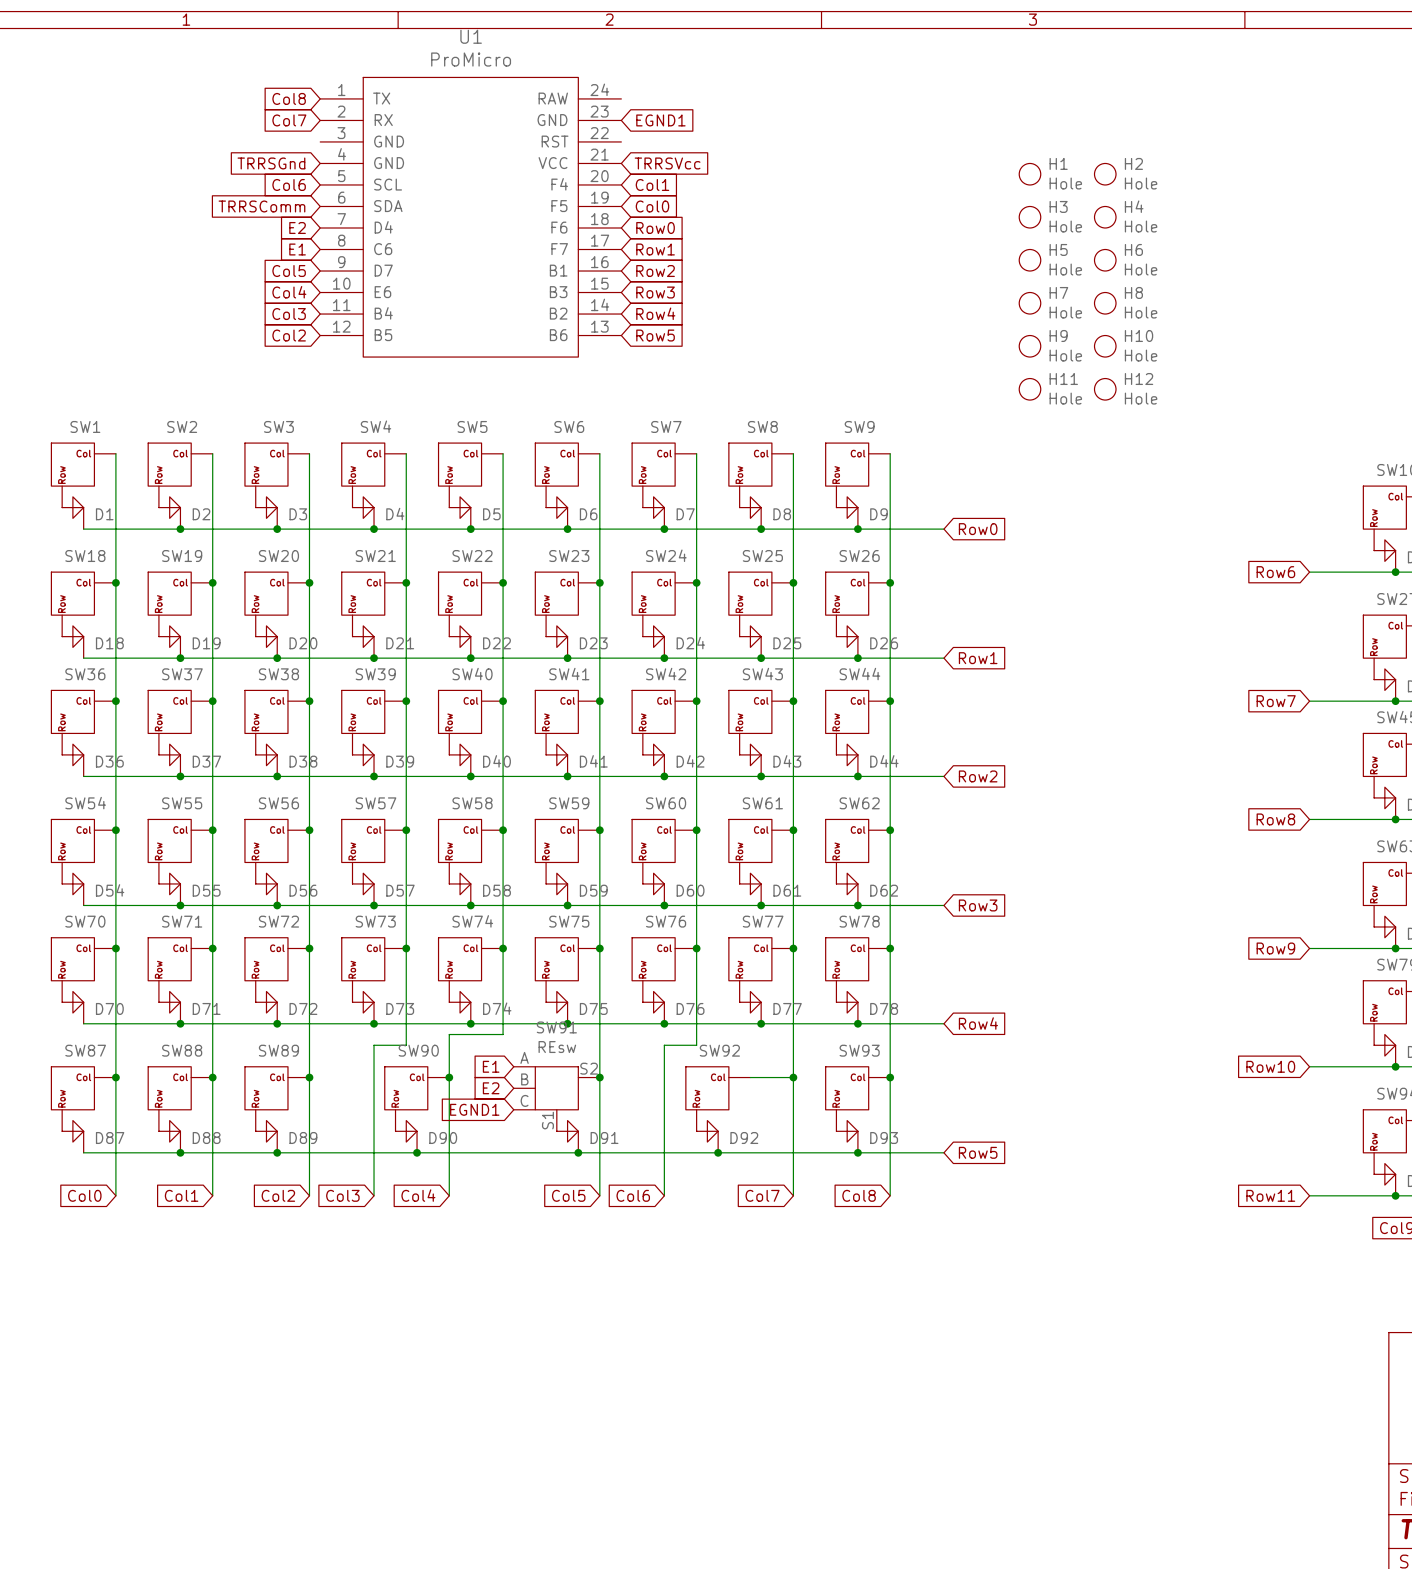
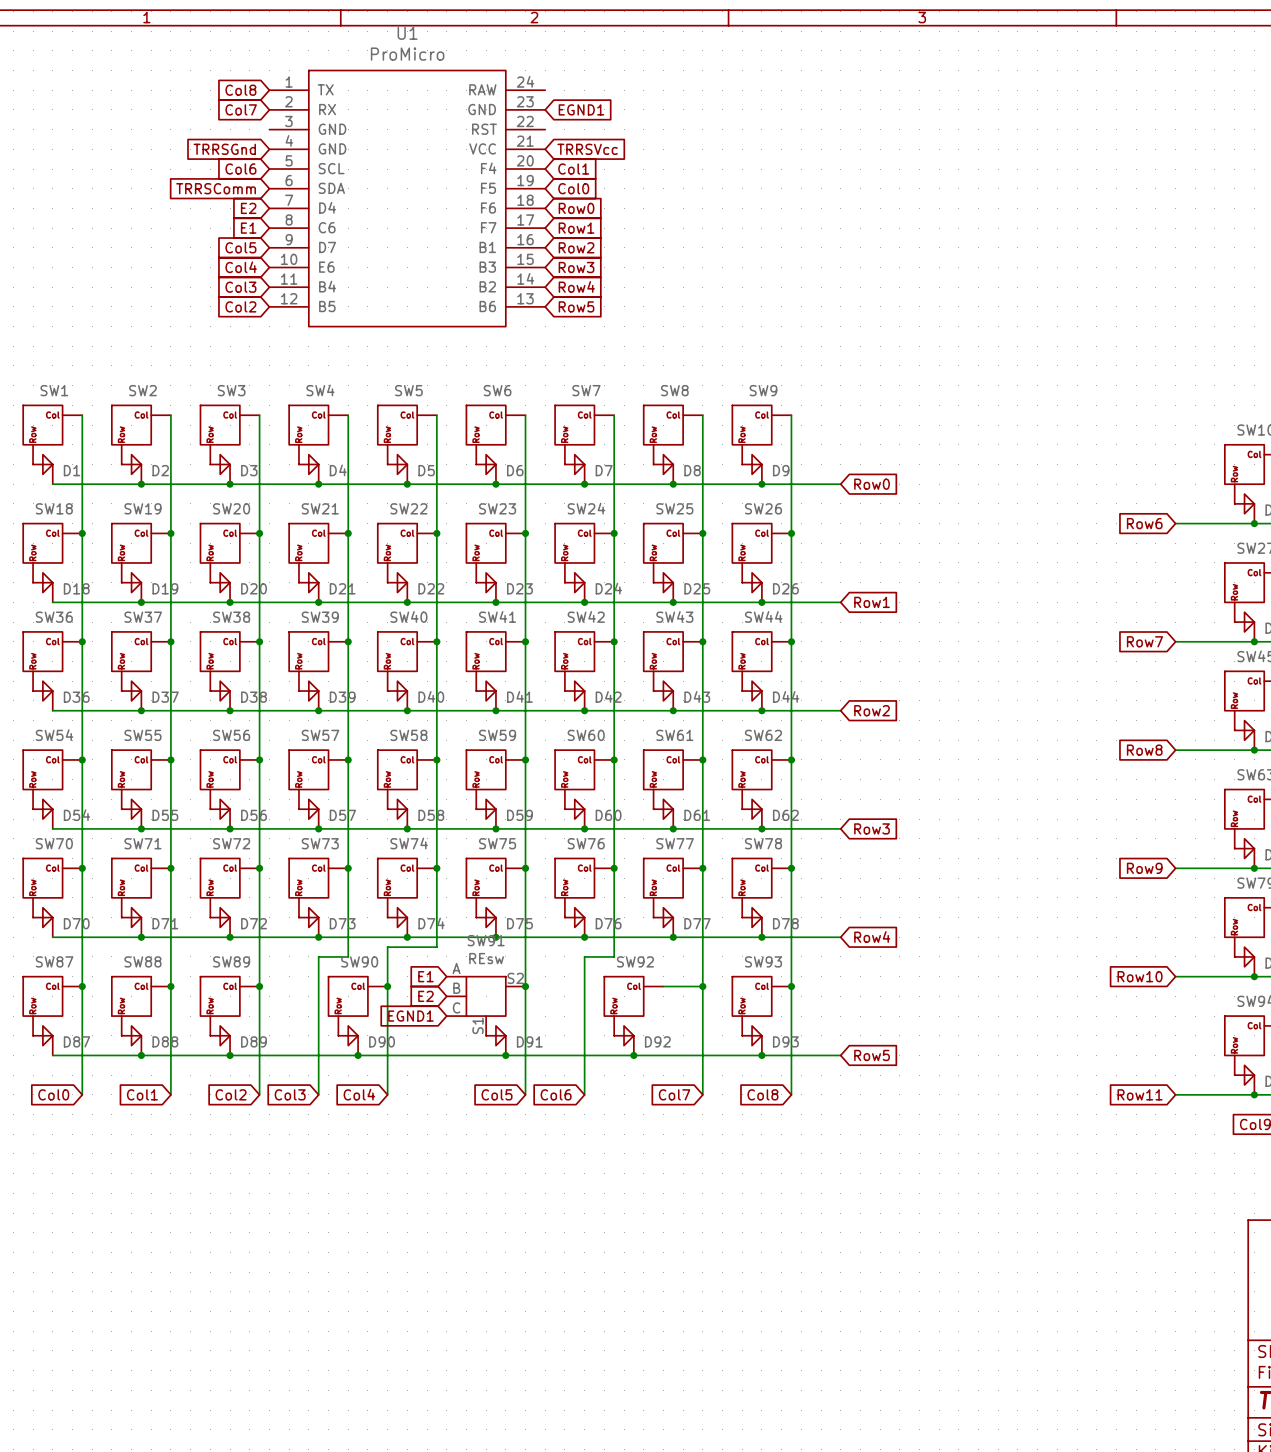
H1: Hole (1029, 174) -> none
H2: Hole (1105, 174) -> none
H3: Hole (1029, 217) -> none
H4: Hole (1105, 217) -> none
H5: Hole (1029, 260) -> none
H6: Hole (1105, 260) -> none
H7: Hole (1029, 303) -> none
H8: Hole (1105, 303) -> none
H9: Hole (1029, 346) -> none
H10: Hole (1105, 346) -> none
H11: Hole (1029, 389) -> none
H12: Hole (1105, 389) -> none

